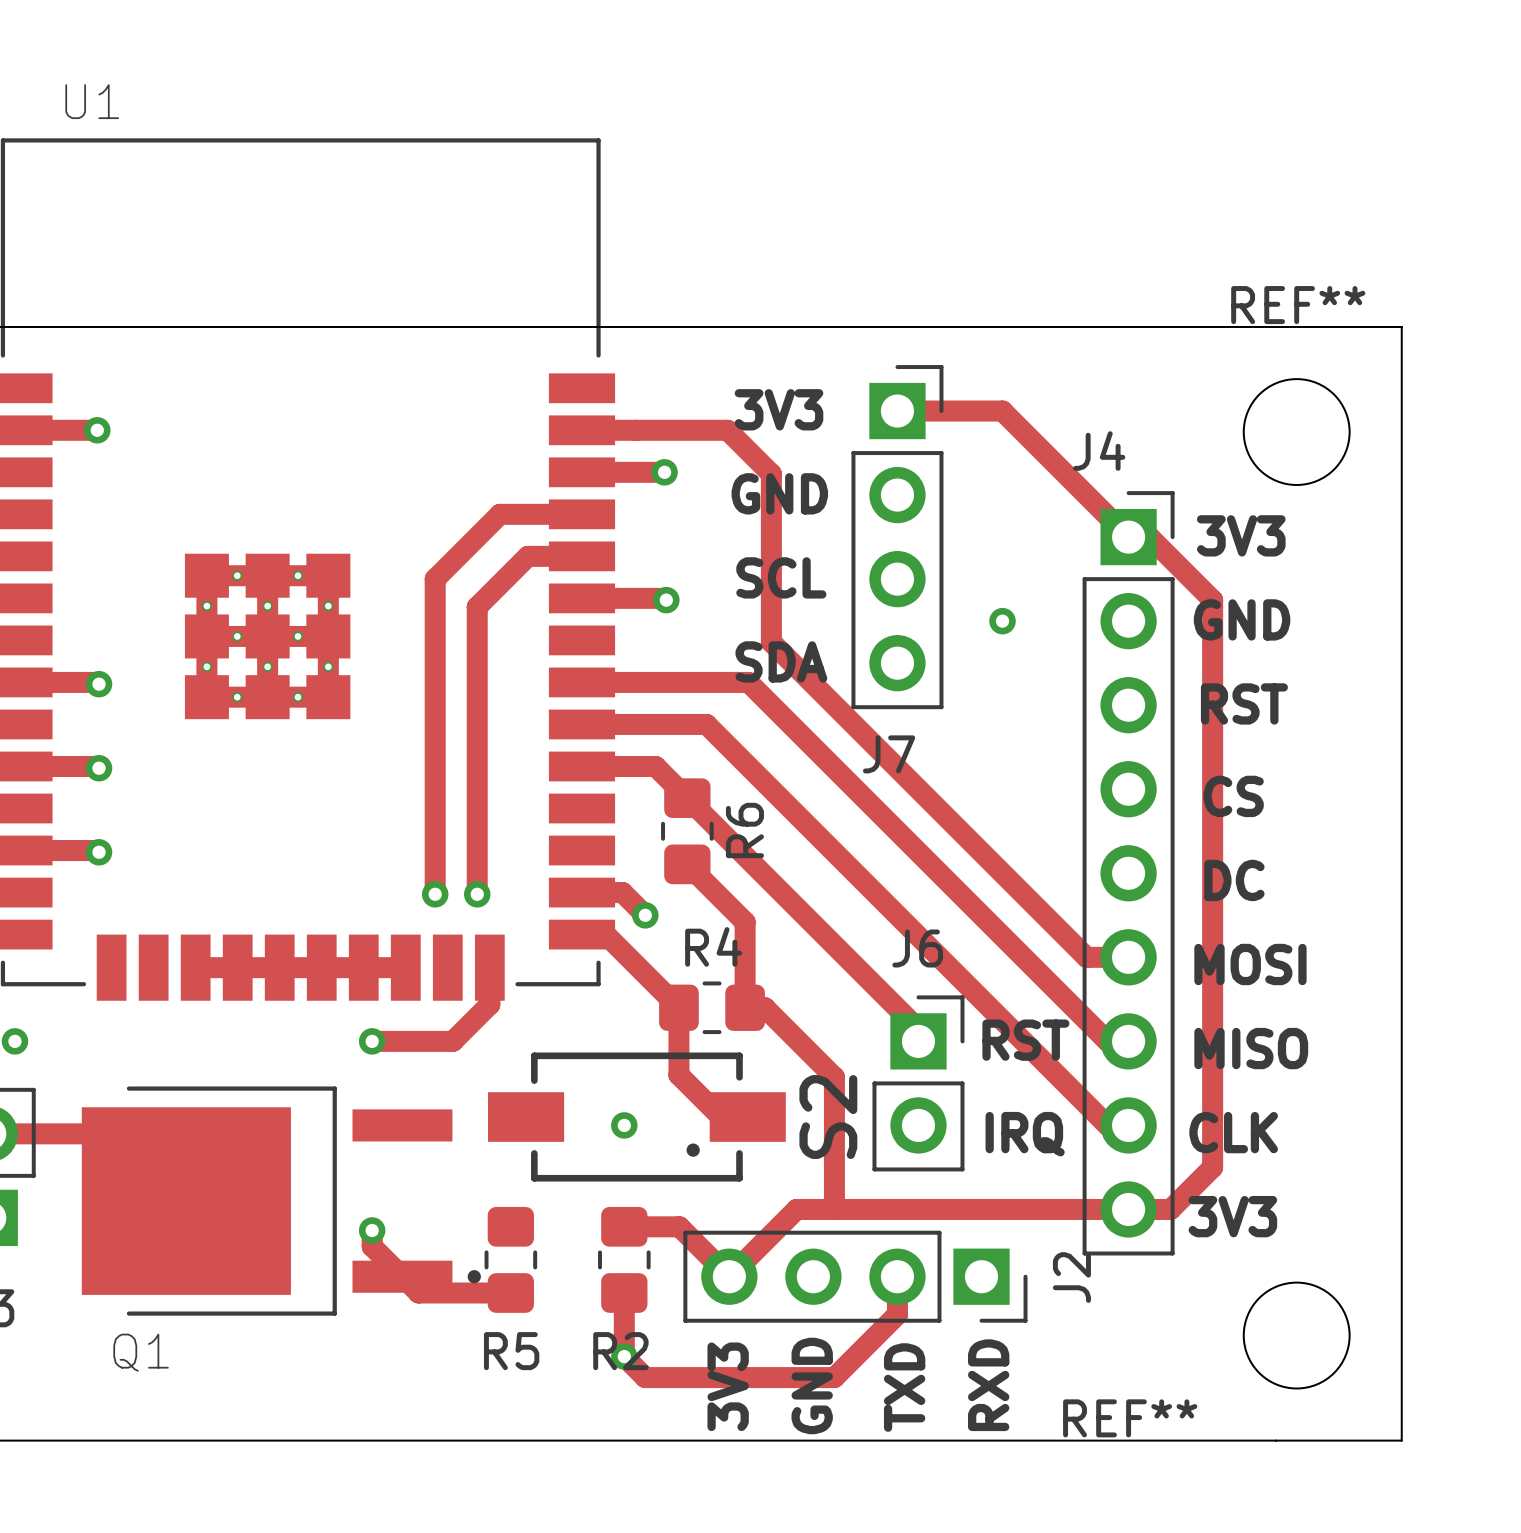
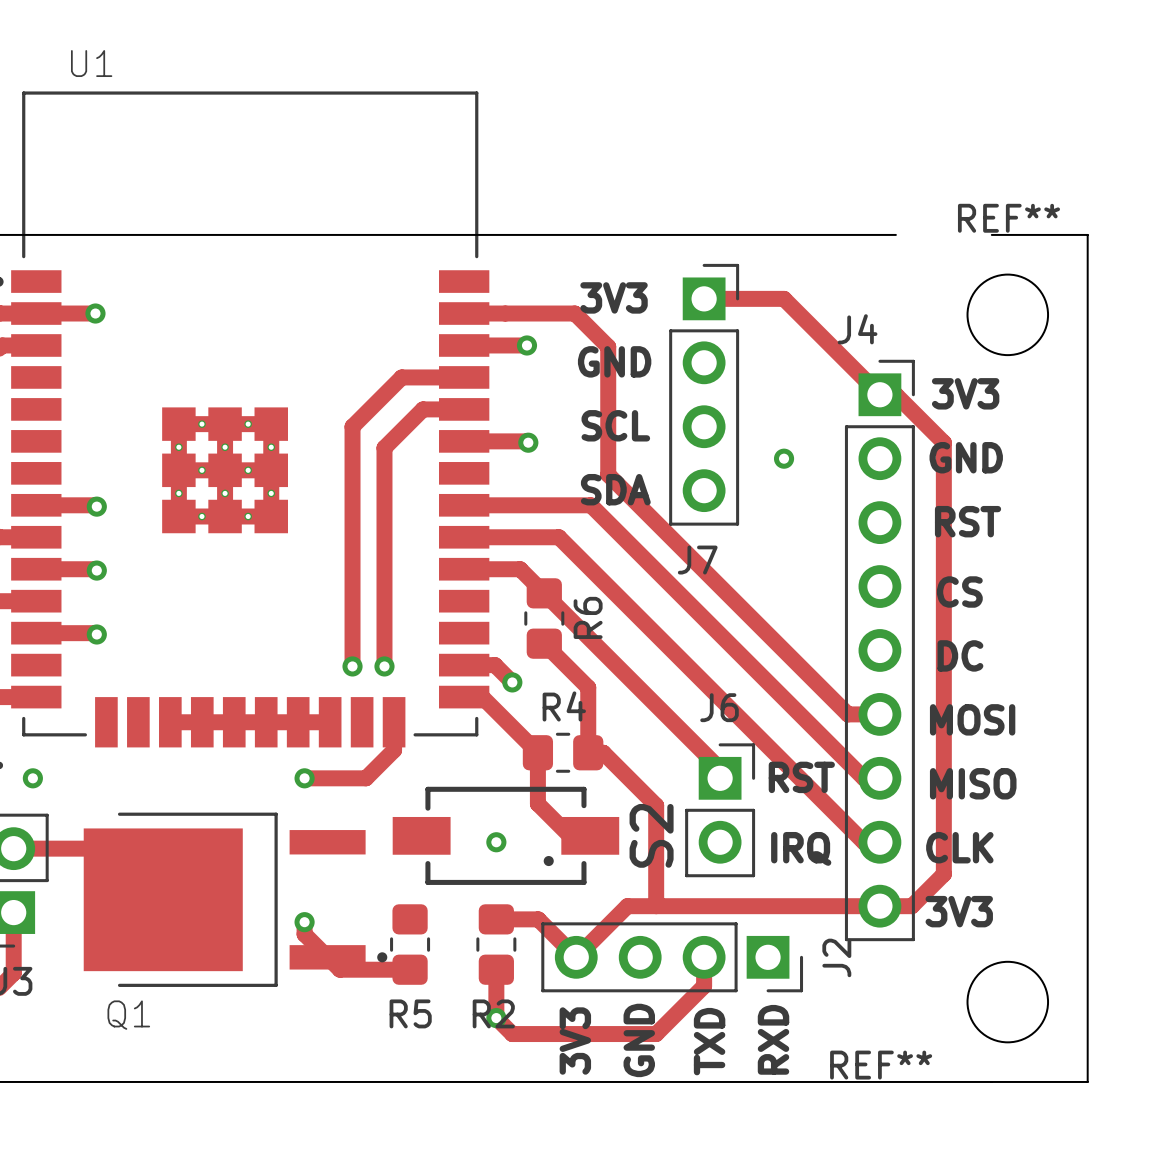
board edge: (1149, 326) (1275, 326) -> none

